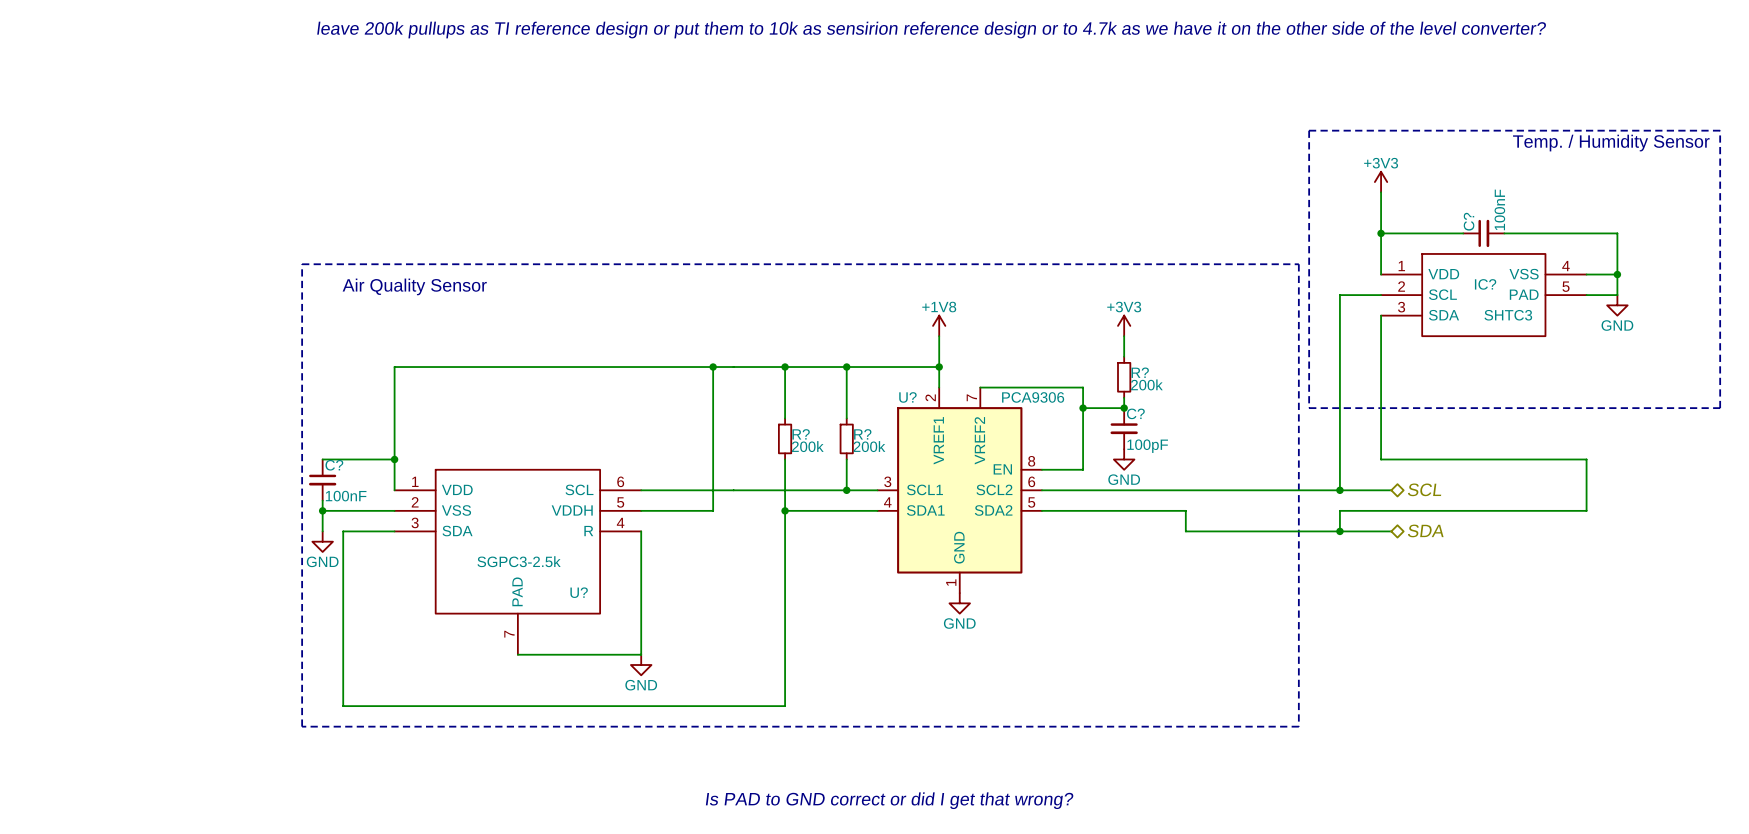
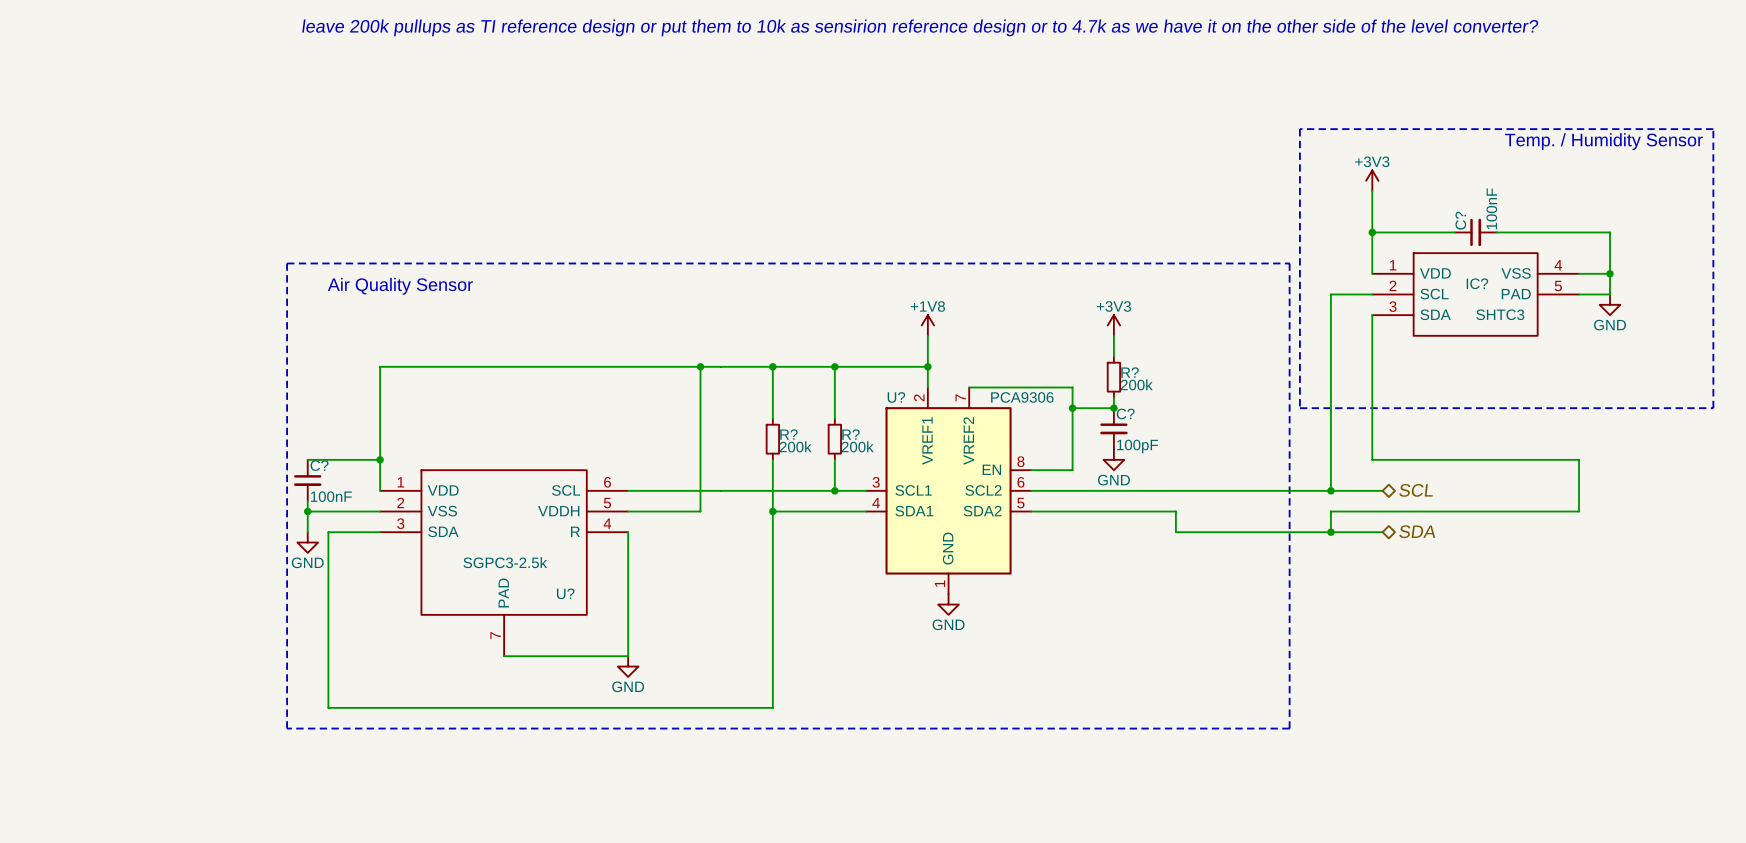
text: Is PAD to GND correct or did I get that wrong? (889, 800) -> none

